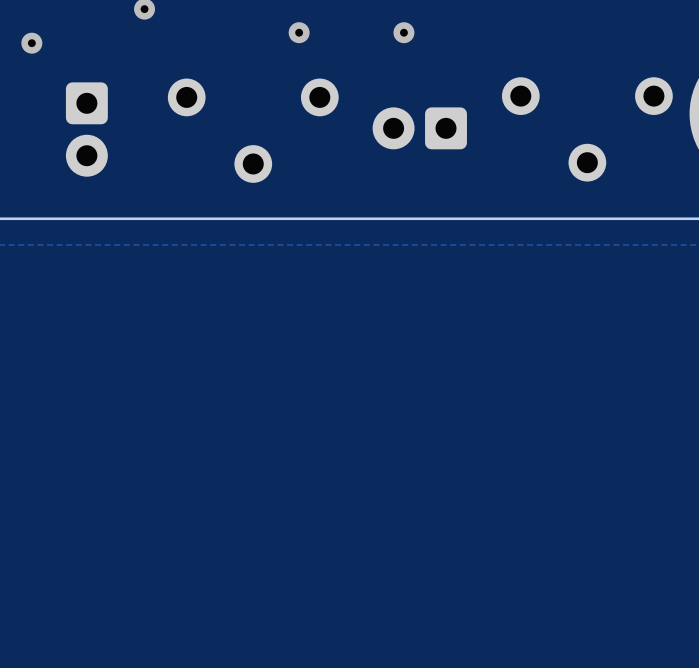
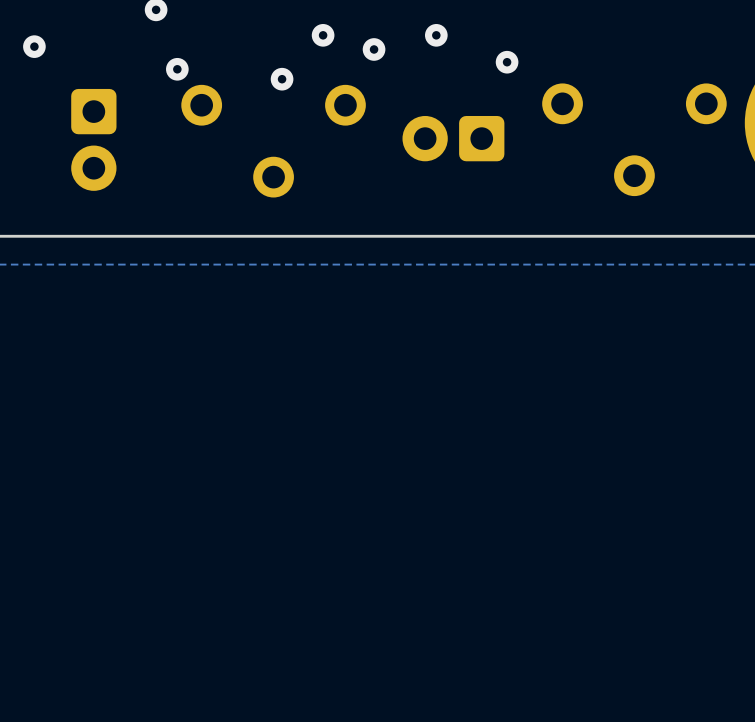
via: none -> (374, 49)
via: none -> (507, 62)
via: none -> (177, 69)
via: none -> (282, 79)

